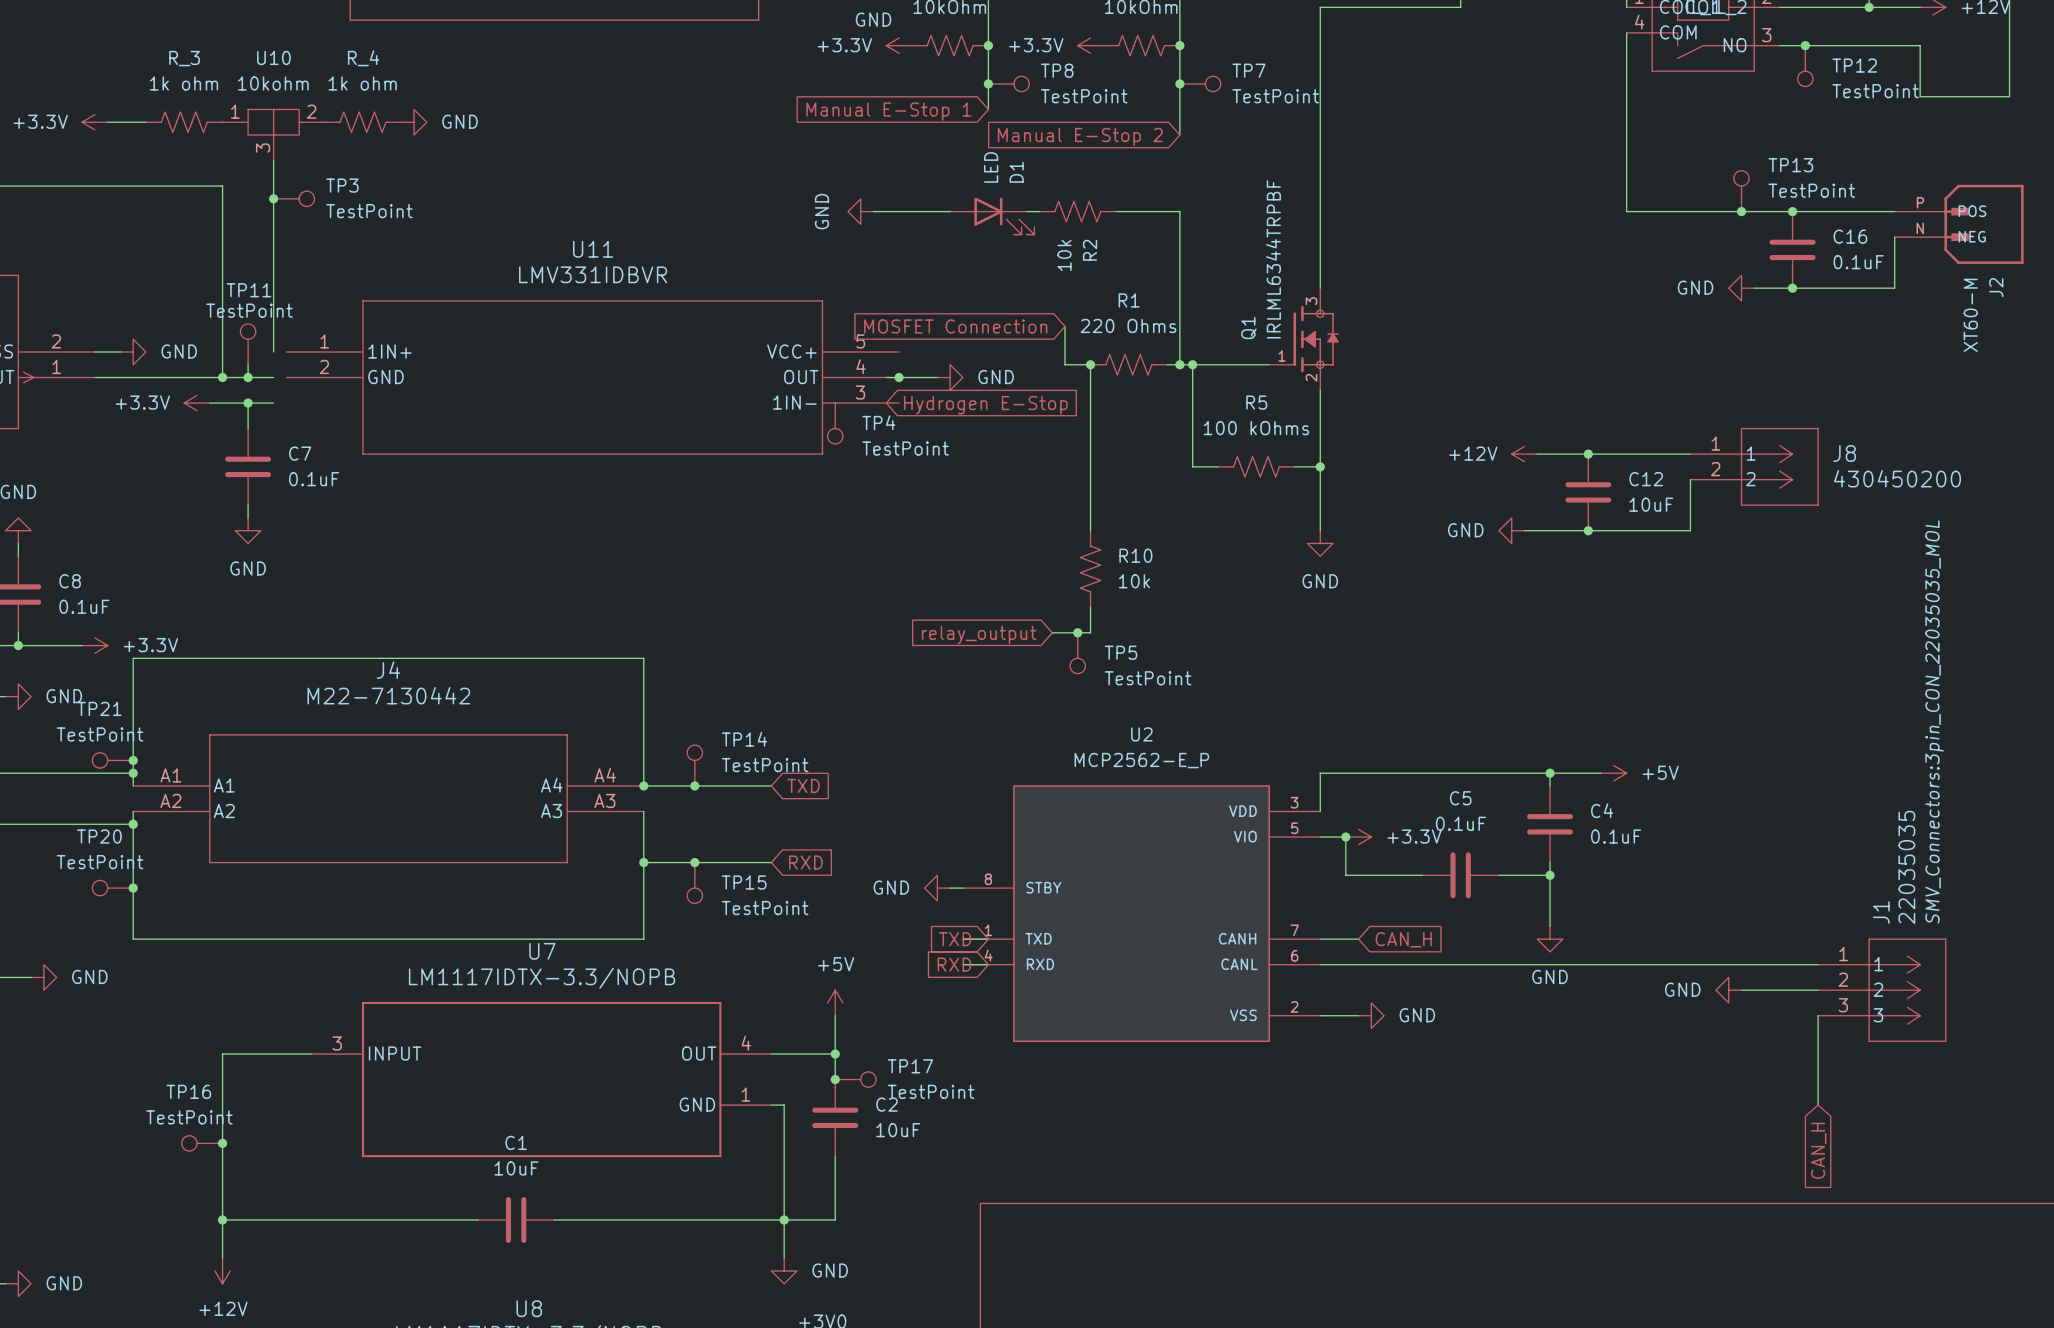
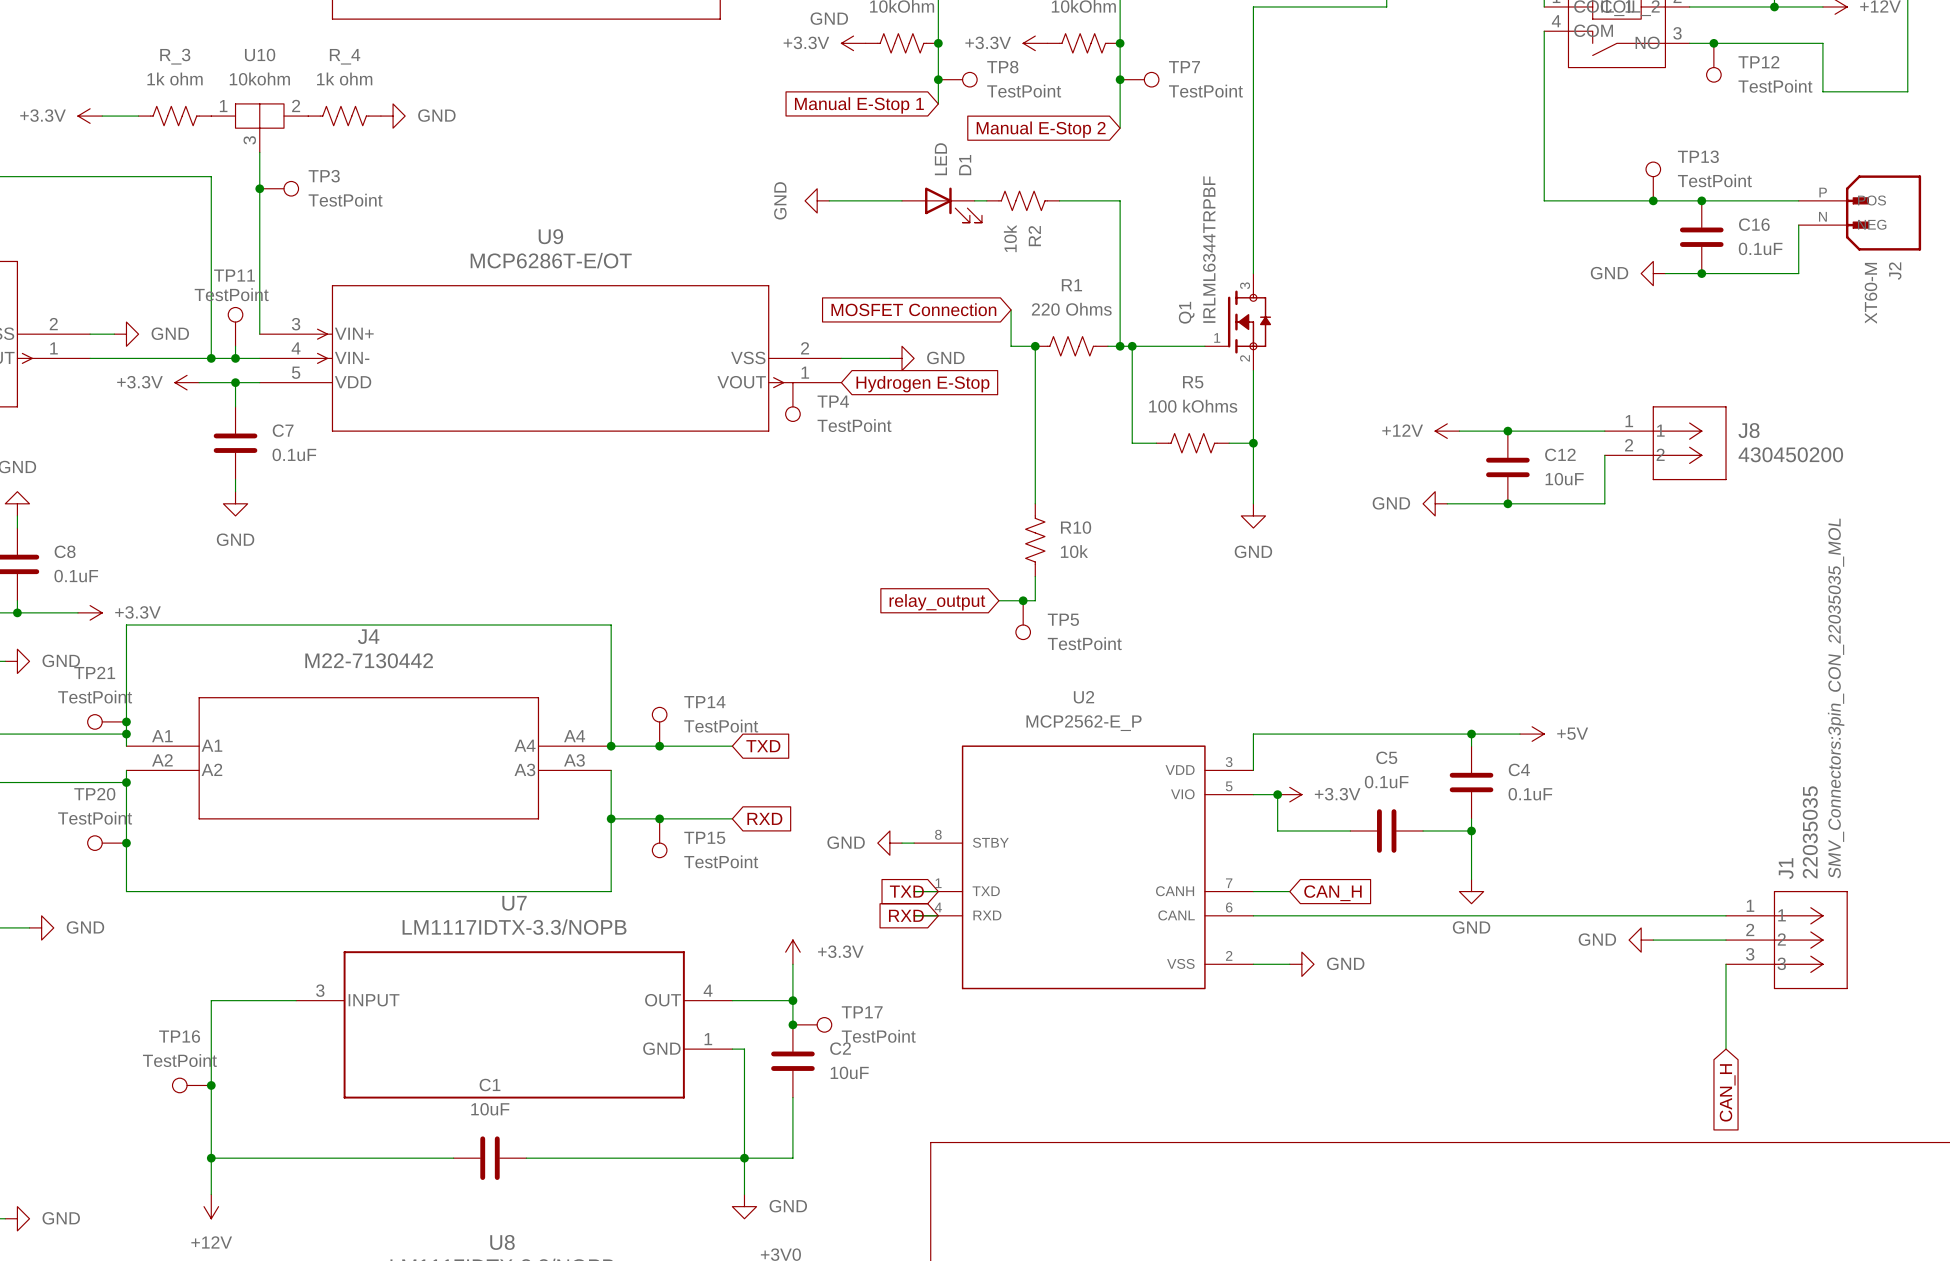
U9: none -> MCP6286T-E/OT (550, 358)
U11: LMV331IDBVR (592, 377) -> none
junction: (899, 377) -> none
power symbol: +5V (835, 1002) -> +3.3V (792, 952)

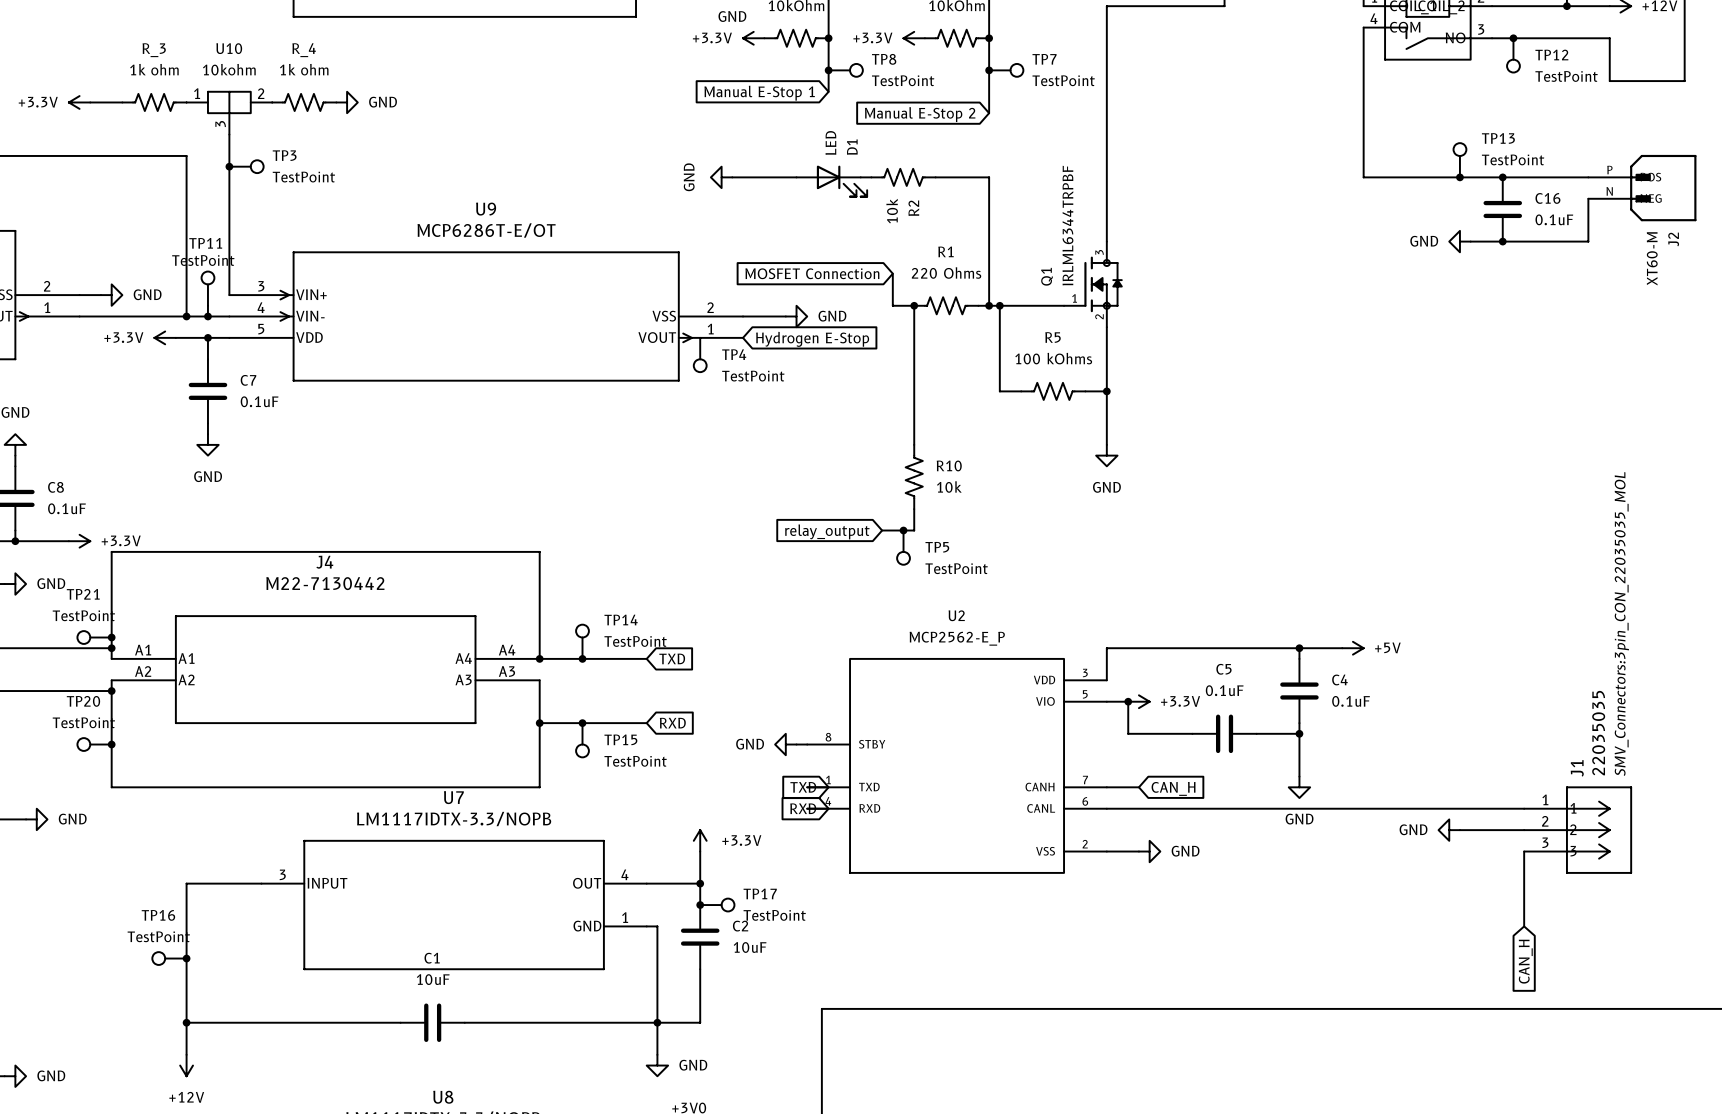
power symbol: +12V (1447, 431) -> none
wire: (1459, 431) (1604, 431) -> none
junction: (1507, 431) -> none
J8: 430450200 (1665, 443) -> none
wire: (1604, 455) (1604, 503) (1447, 503) -> none
C12: 10uF (1507, 467) -> none
power symbol: GND (1435, 503) -> none
junction: (1507, 503) -> none

